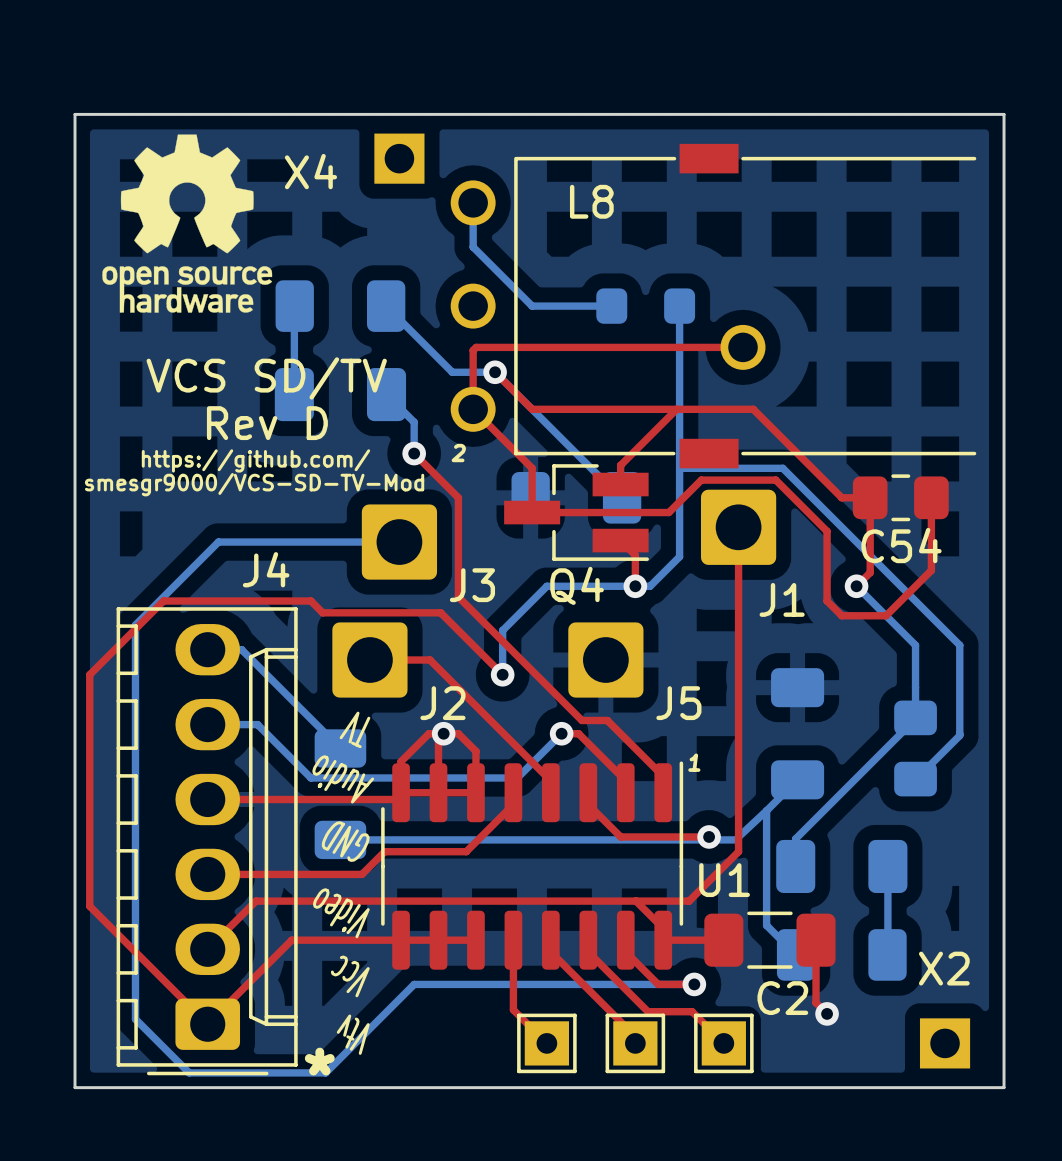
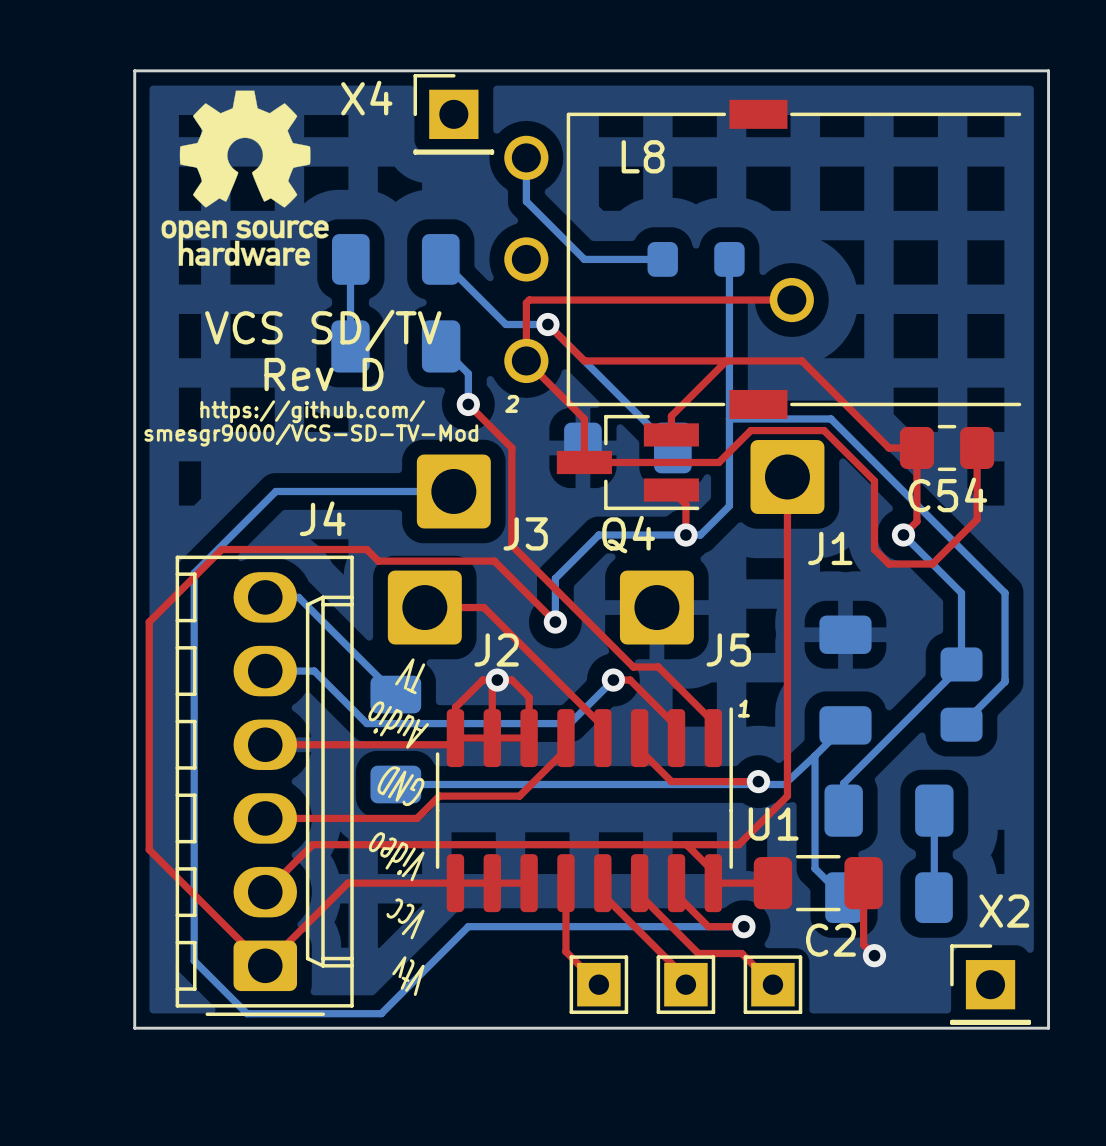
X4 side: bottom (399, 158) -> top (453, 114)
X2 side: bottom (945, 1043) -> top (990, 984)
text: * (319, 1061) -> none

